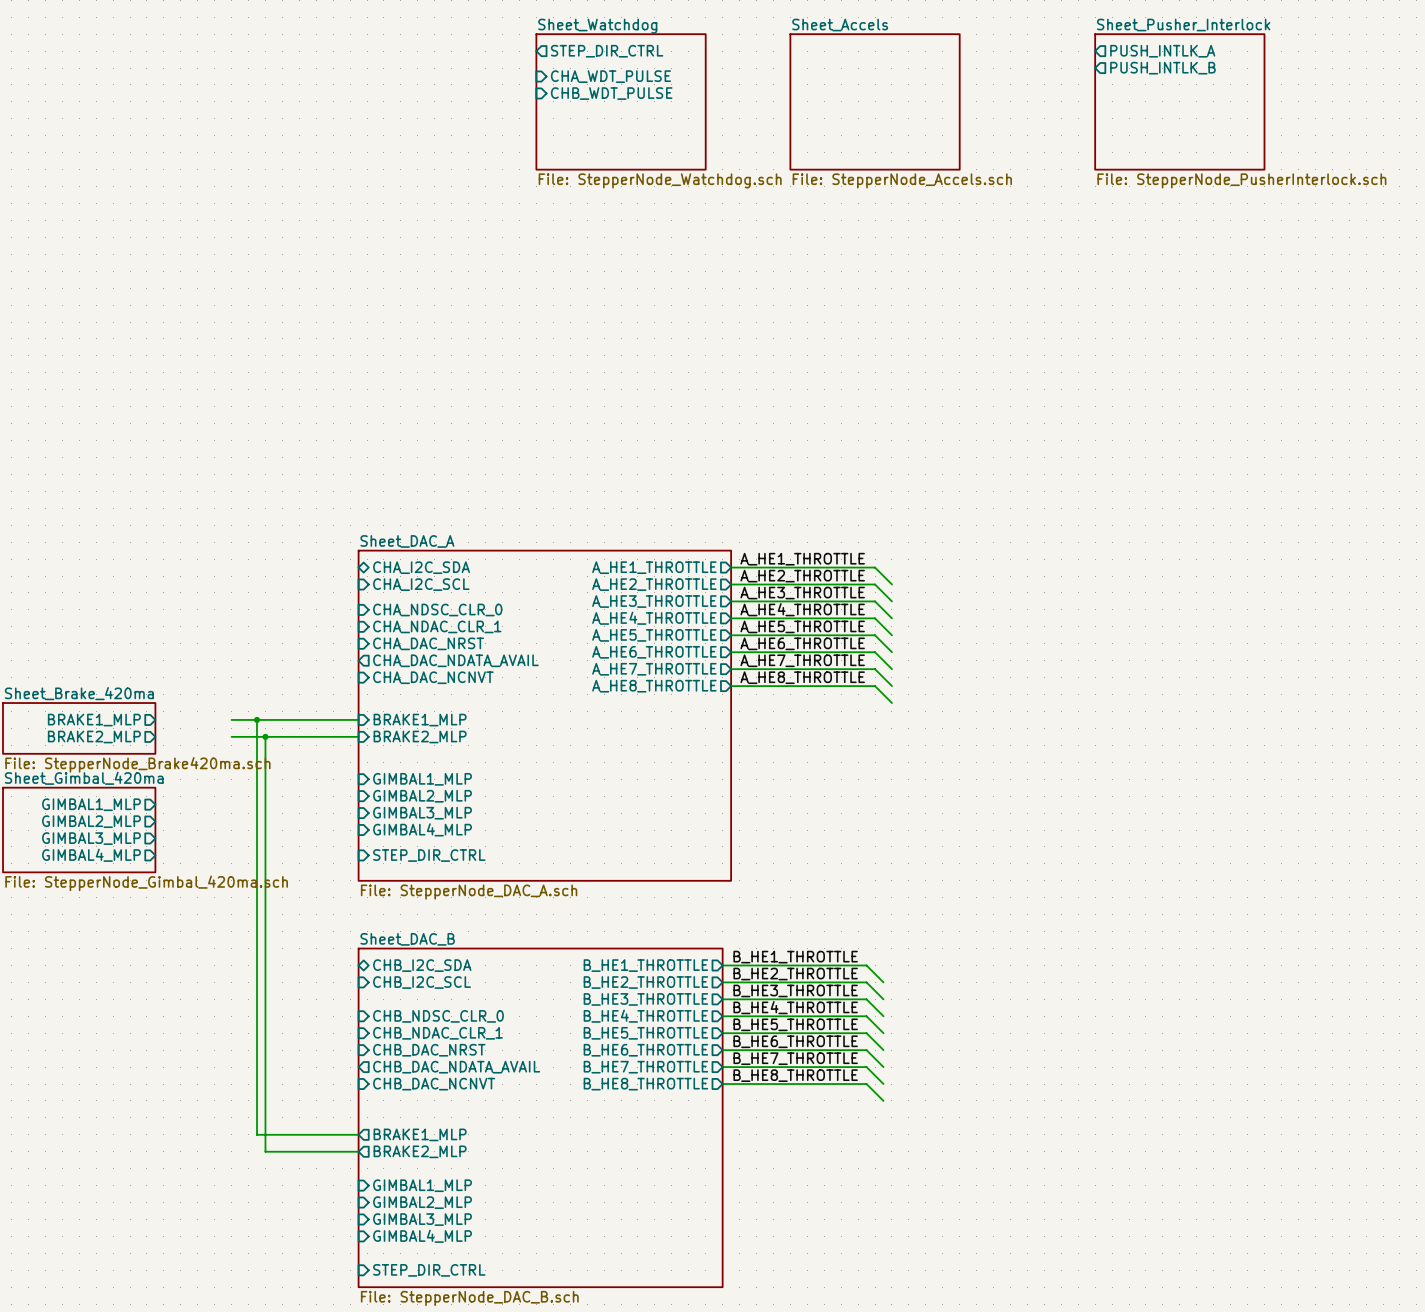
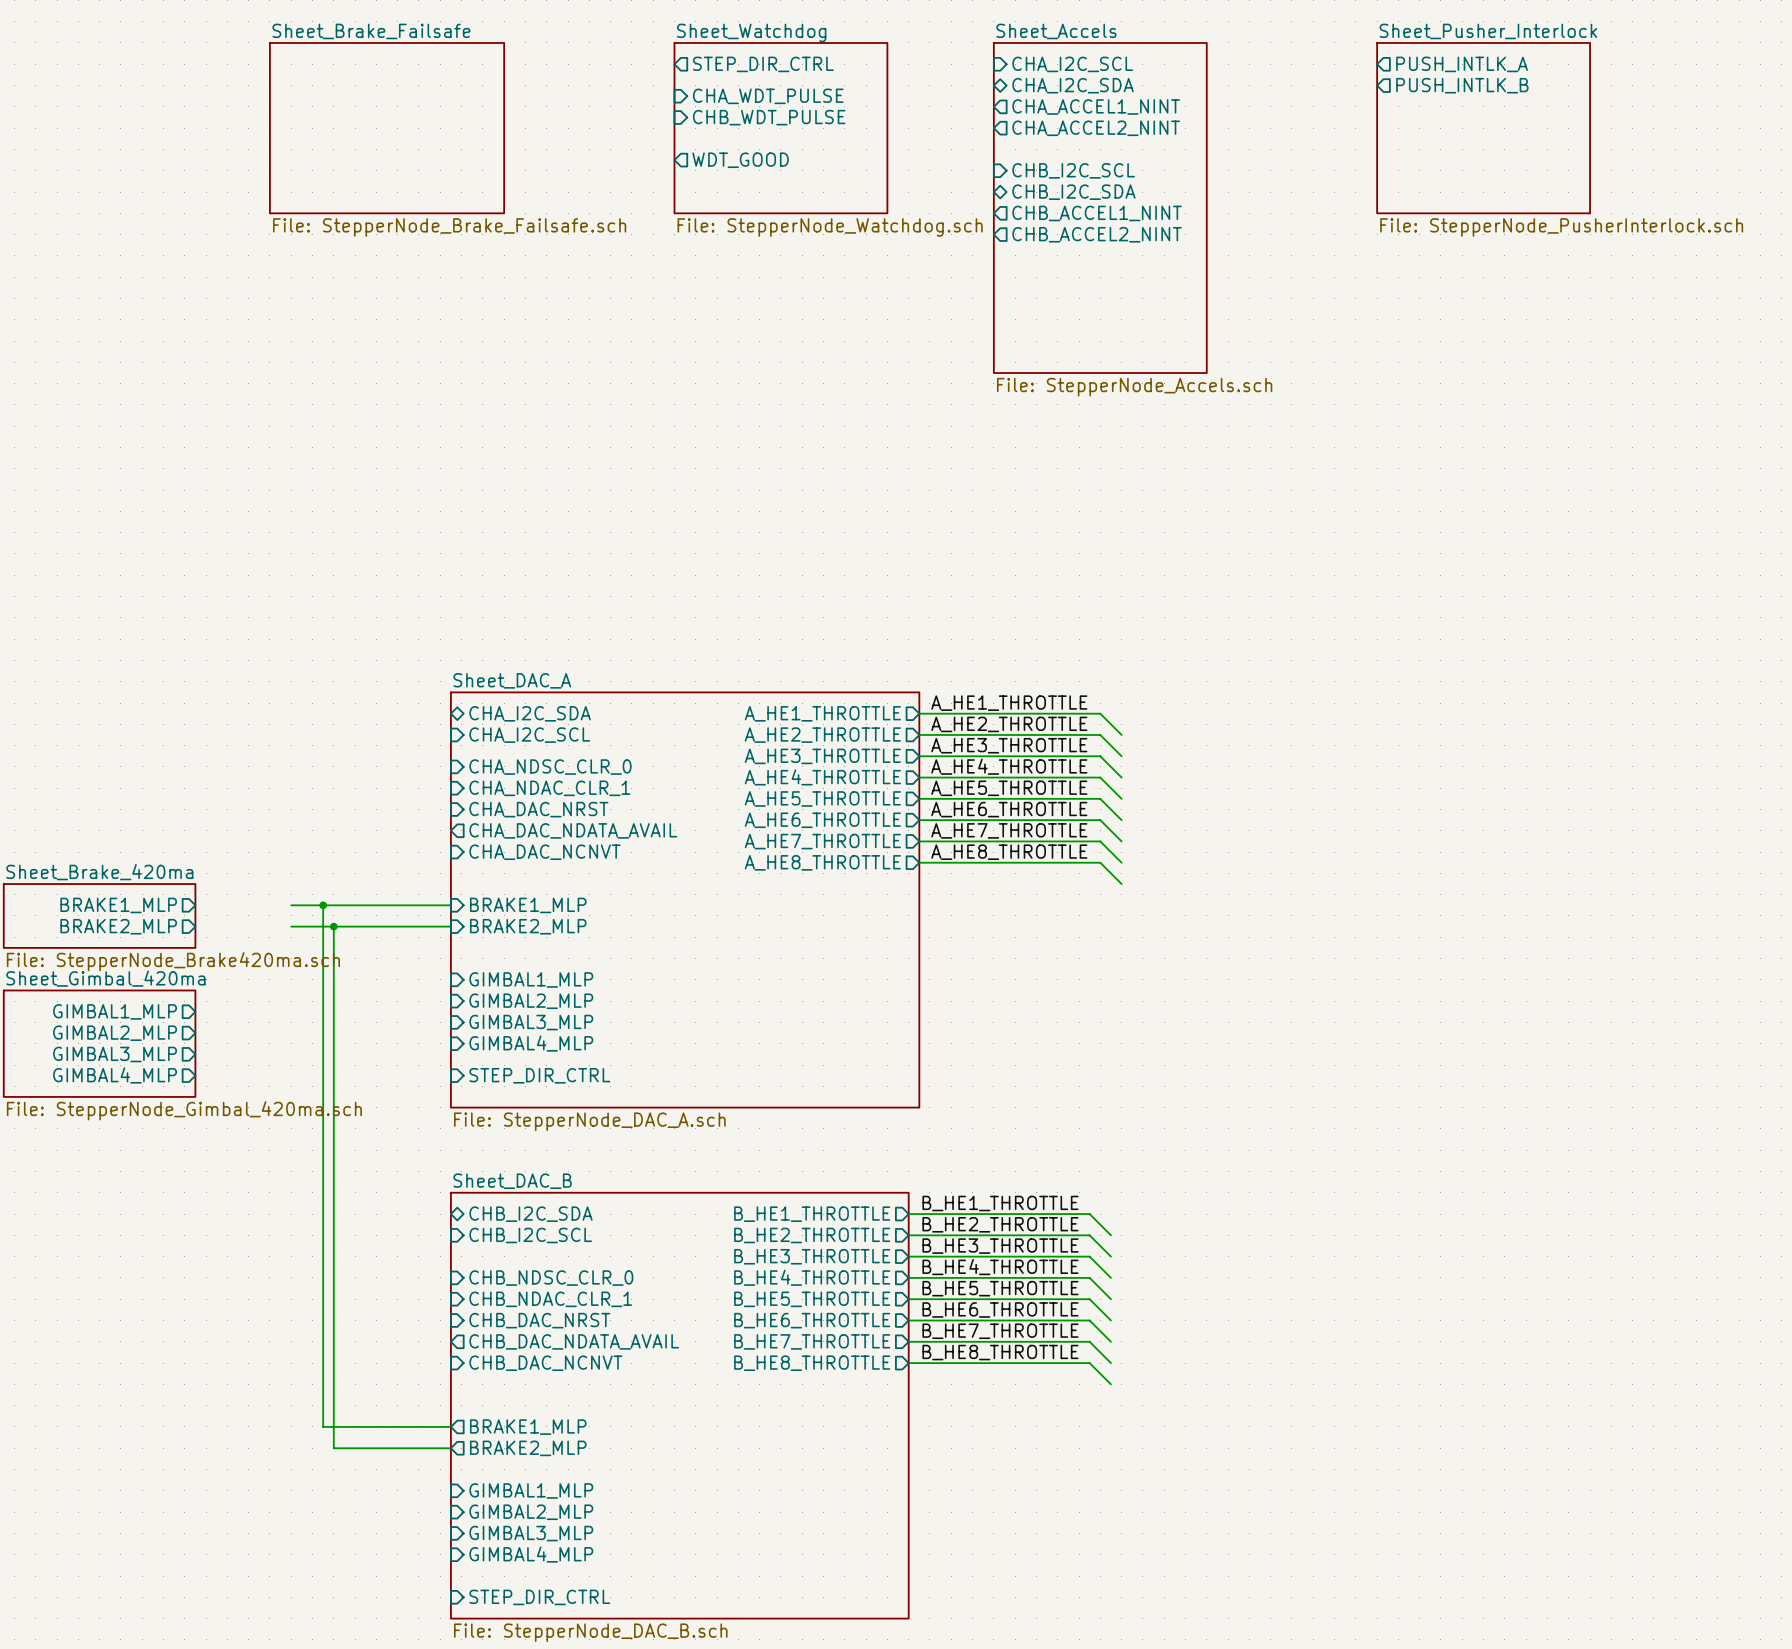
sheet pin: none -> CHA_I2C_SCL (1072, 64)
sheet pin: none -> CHA_I2C_SDA (1073, 85)
sheet pin: none -> CHA_ACCEL1_NINT (1096, 106)
sheet Sheet_Brake_Failsafe: none -> File: StepperNode_Brake_Failsafe.sch (387, 128)
sheet Sheet_Accels: File: StepperNode_Accels.sch (875, 101) -> none
sheet pin: none -> CHA_ACCEL2_NINT (1096, 128)
sheet pin: none -> WDT_GOOD (740, 160)
sheet pin: none -> CHB_I2C_SCL (1073, 170)
sheet pin: none -> CHB_I2C_SDA (1073, 192)
sheet Sheet_Accels: none -> File: StepperNode_Accels.sch (1100, 208)
sheet pin: none -> CHB_ACCEL1_NINT (1097, 213)
sheet pin: none -> CHB_ACCEL2_NINT (1097, 234)

